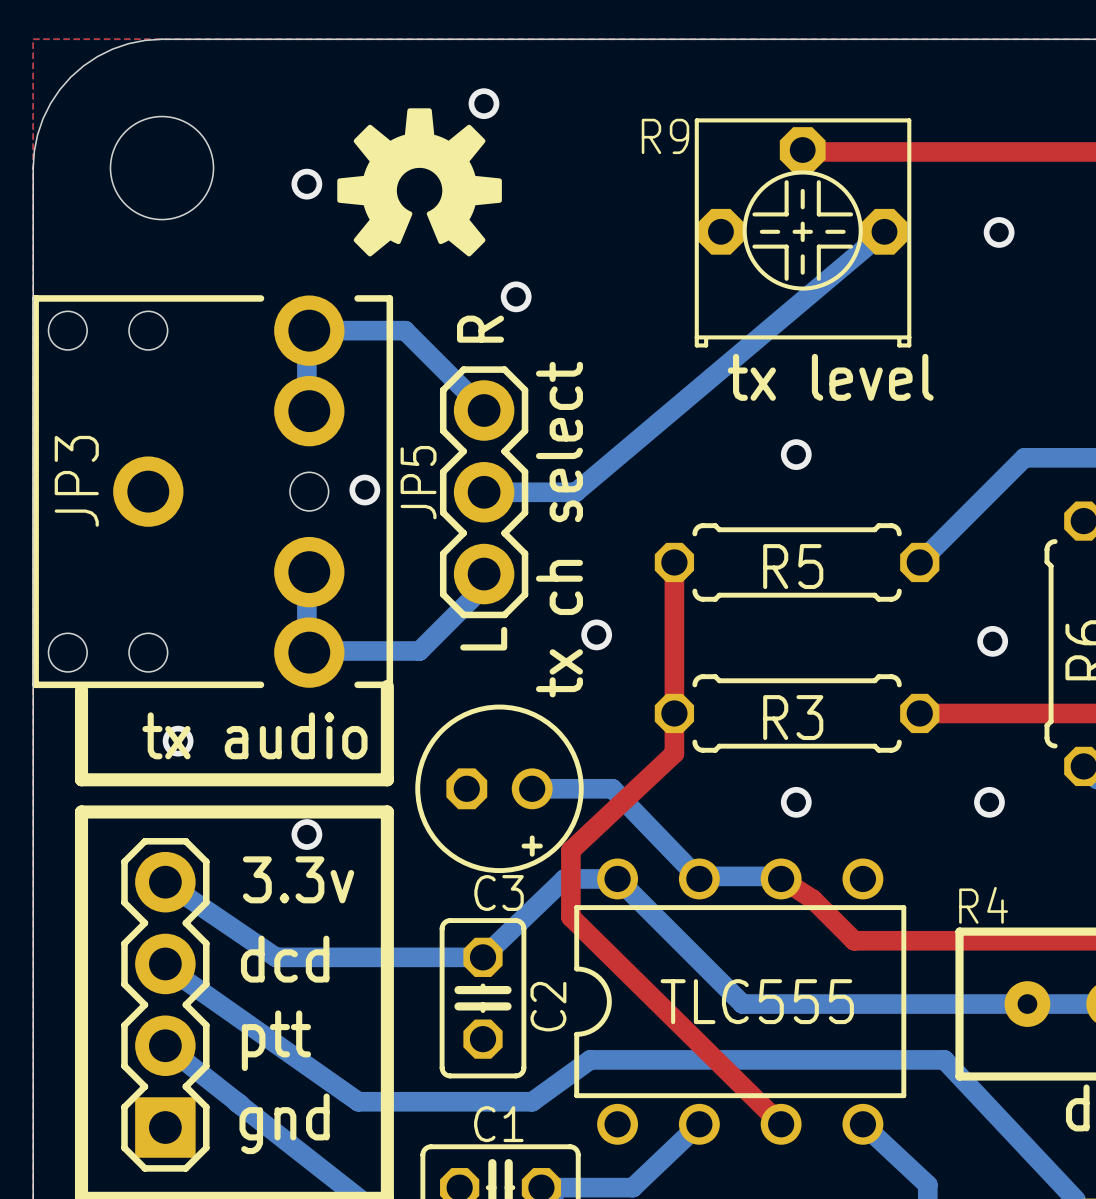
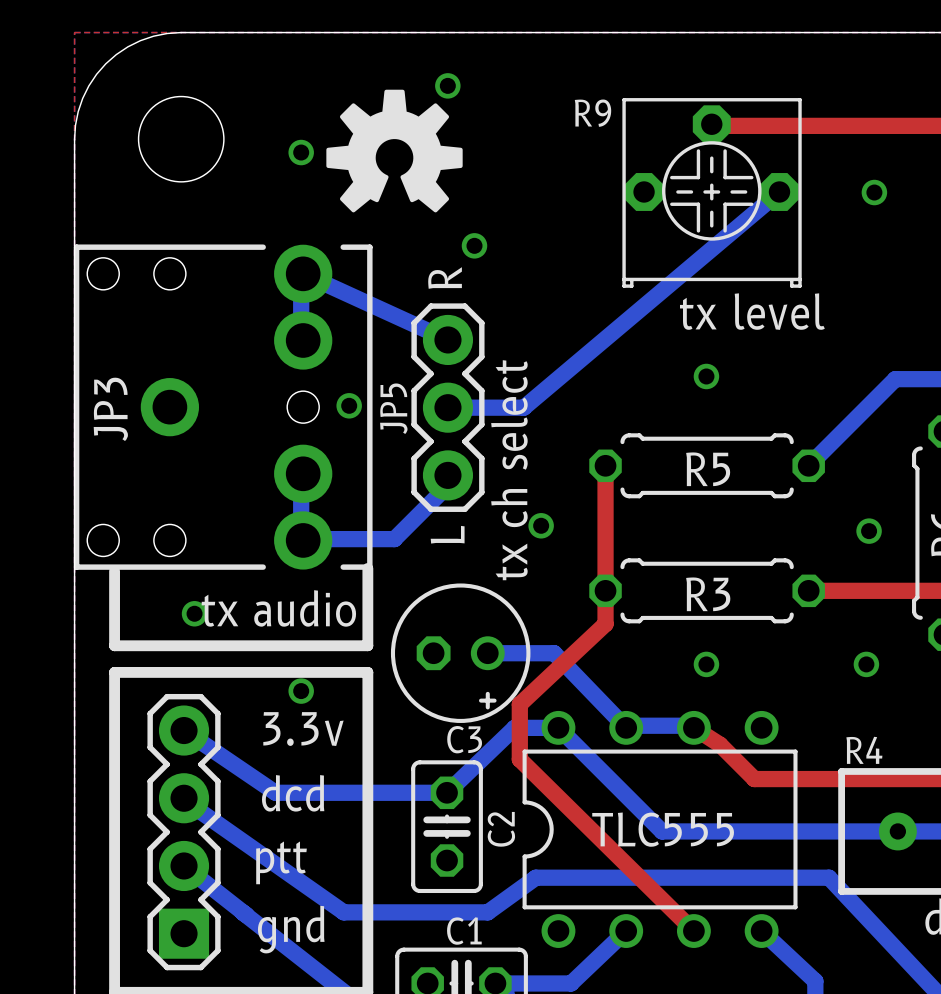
bottom track: (309, 330) (405, 330) (483, 409) -> (303, 273) (447, 339)

